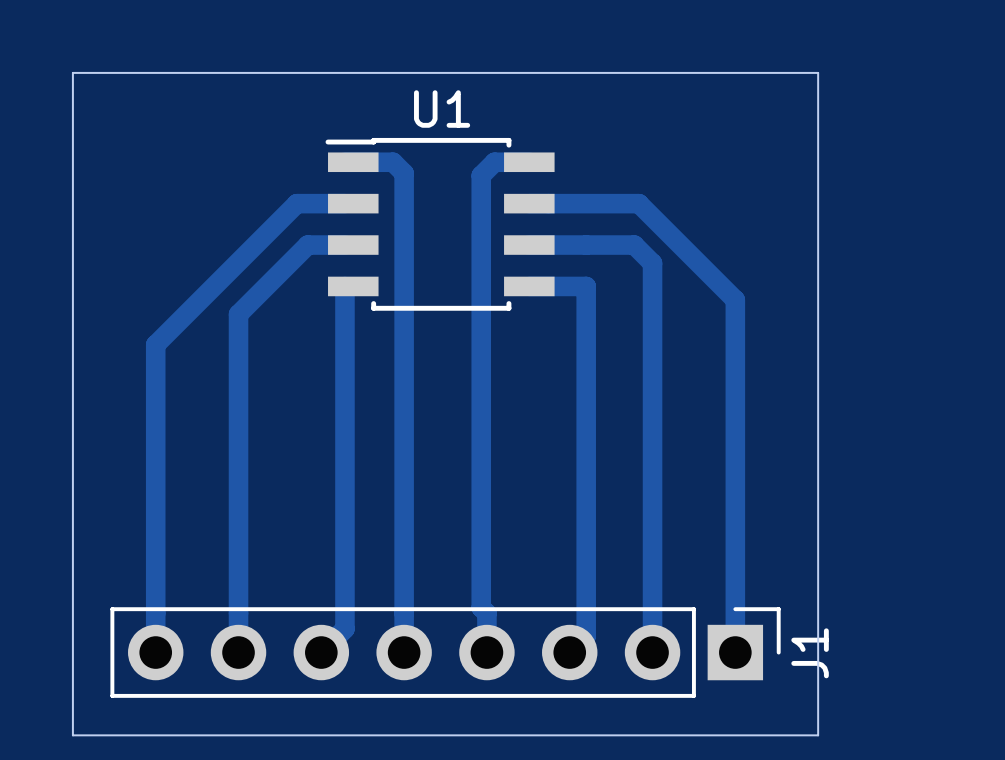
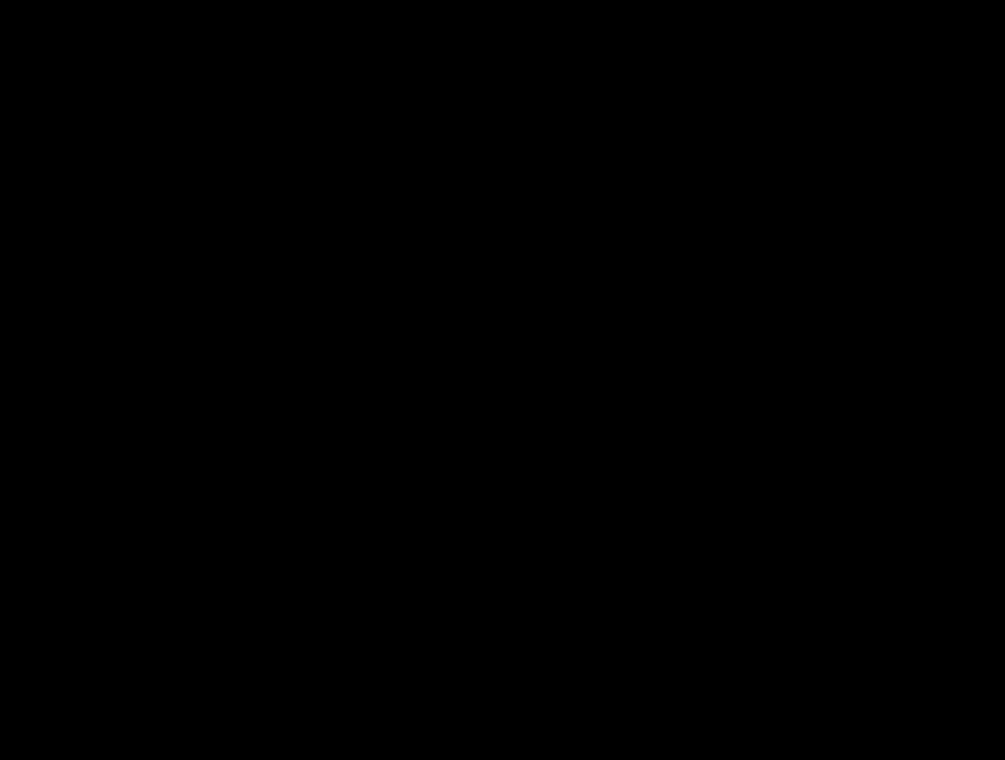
board edge: (72, 72) (818, 72) (818, 735) (72, 735) (72, 72) -> none
track: (344, 162) (393, 162) (404, 173) (404, 652) -> none
track: (529, 162) (494, 162) (481, 175) (481, 607) (486, 613) (486, 652) -> none
track: (344, 203) (296, 203) (155, 344) (155, 652) -> none
track: (529, 203) (638, 203) (735, 300) (735, 652) -> none
U1: (440, 224) -> none
track: (344, 245) (307, 245) (238, 314) (238, 652) -> none
track: (529, 245) (634, 245) (652, 263) (652, 652) -> none
track: (344, 286) (344, 628) (321, 652) -> none
track: (529, 286) (586, 286) (586, 636) (569, 652) -> none
J1: (445, 652) -> none

